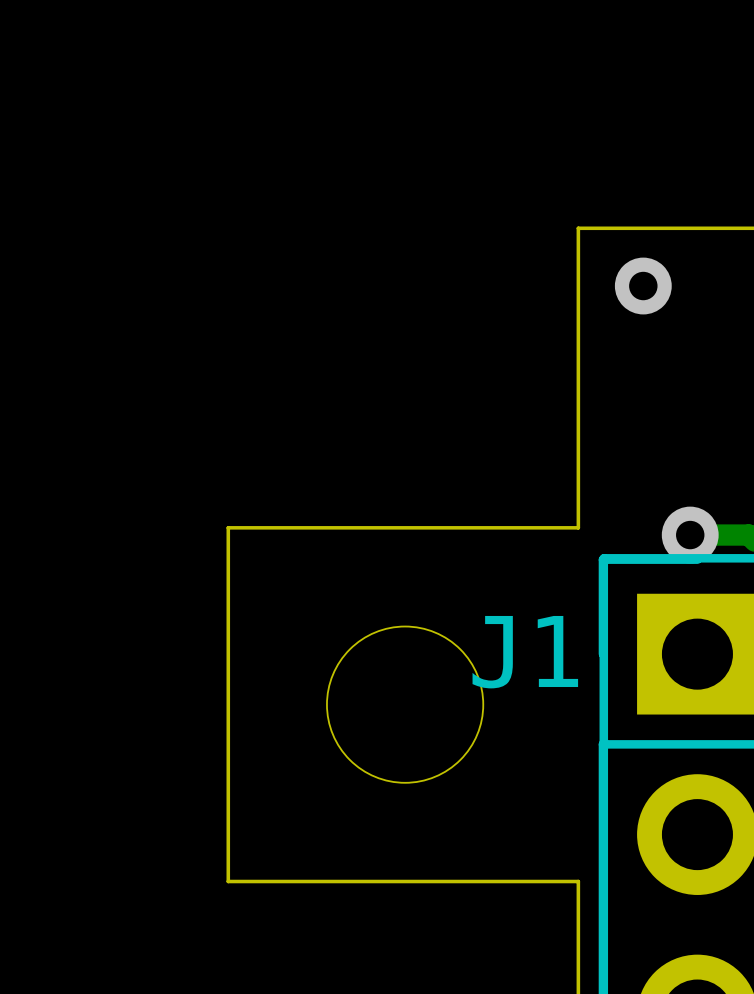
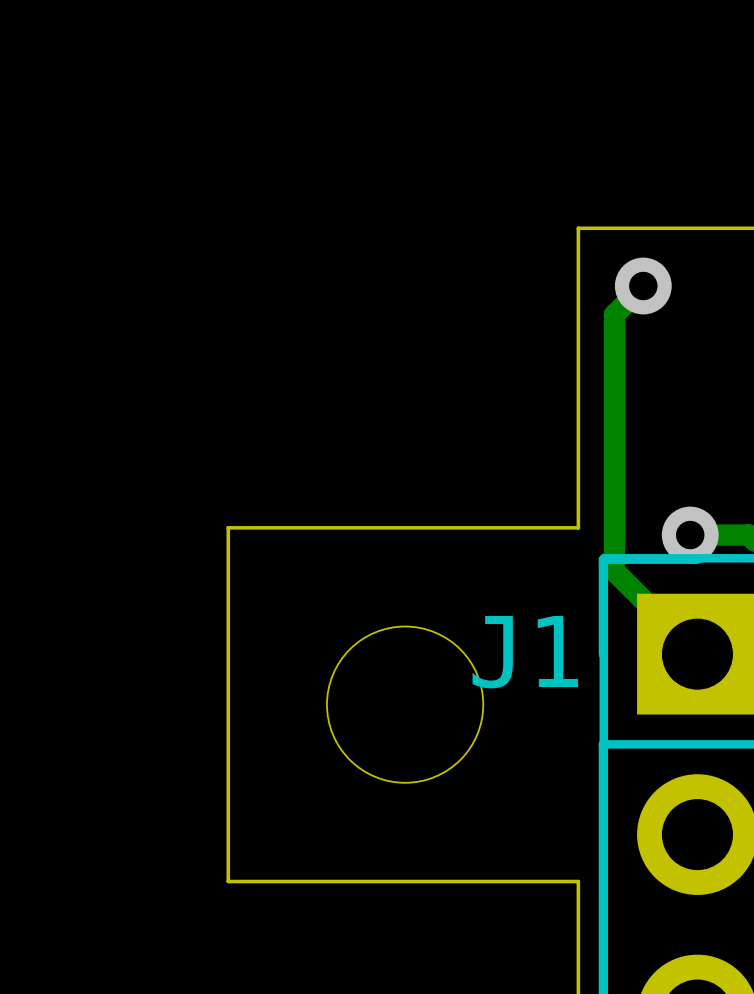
track: none -> (643, 286) (614, 314) (614, 571) (697, 654)

